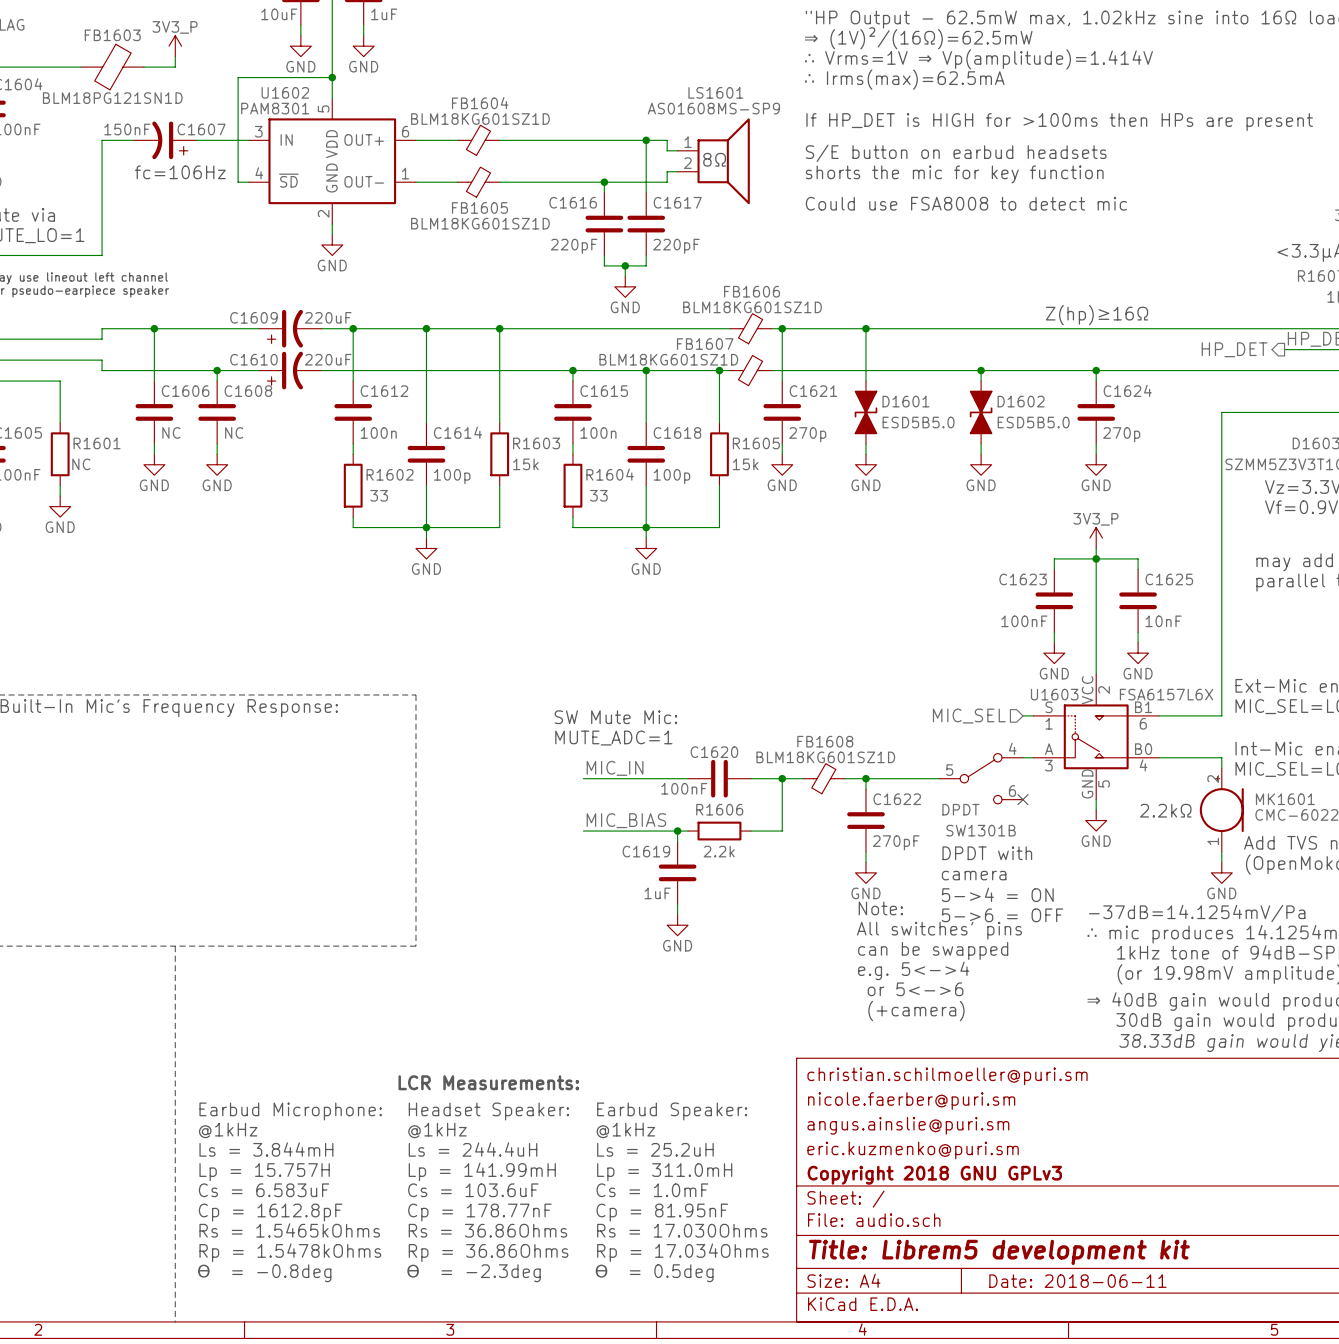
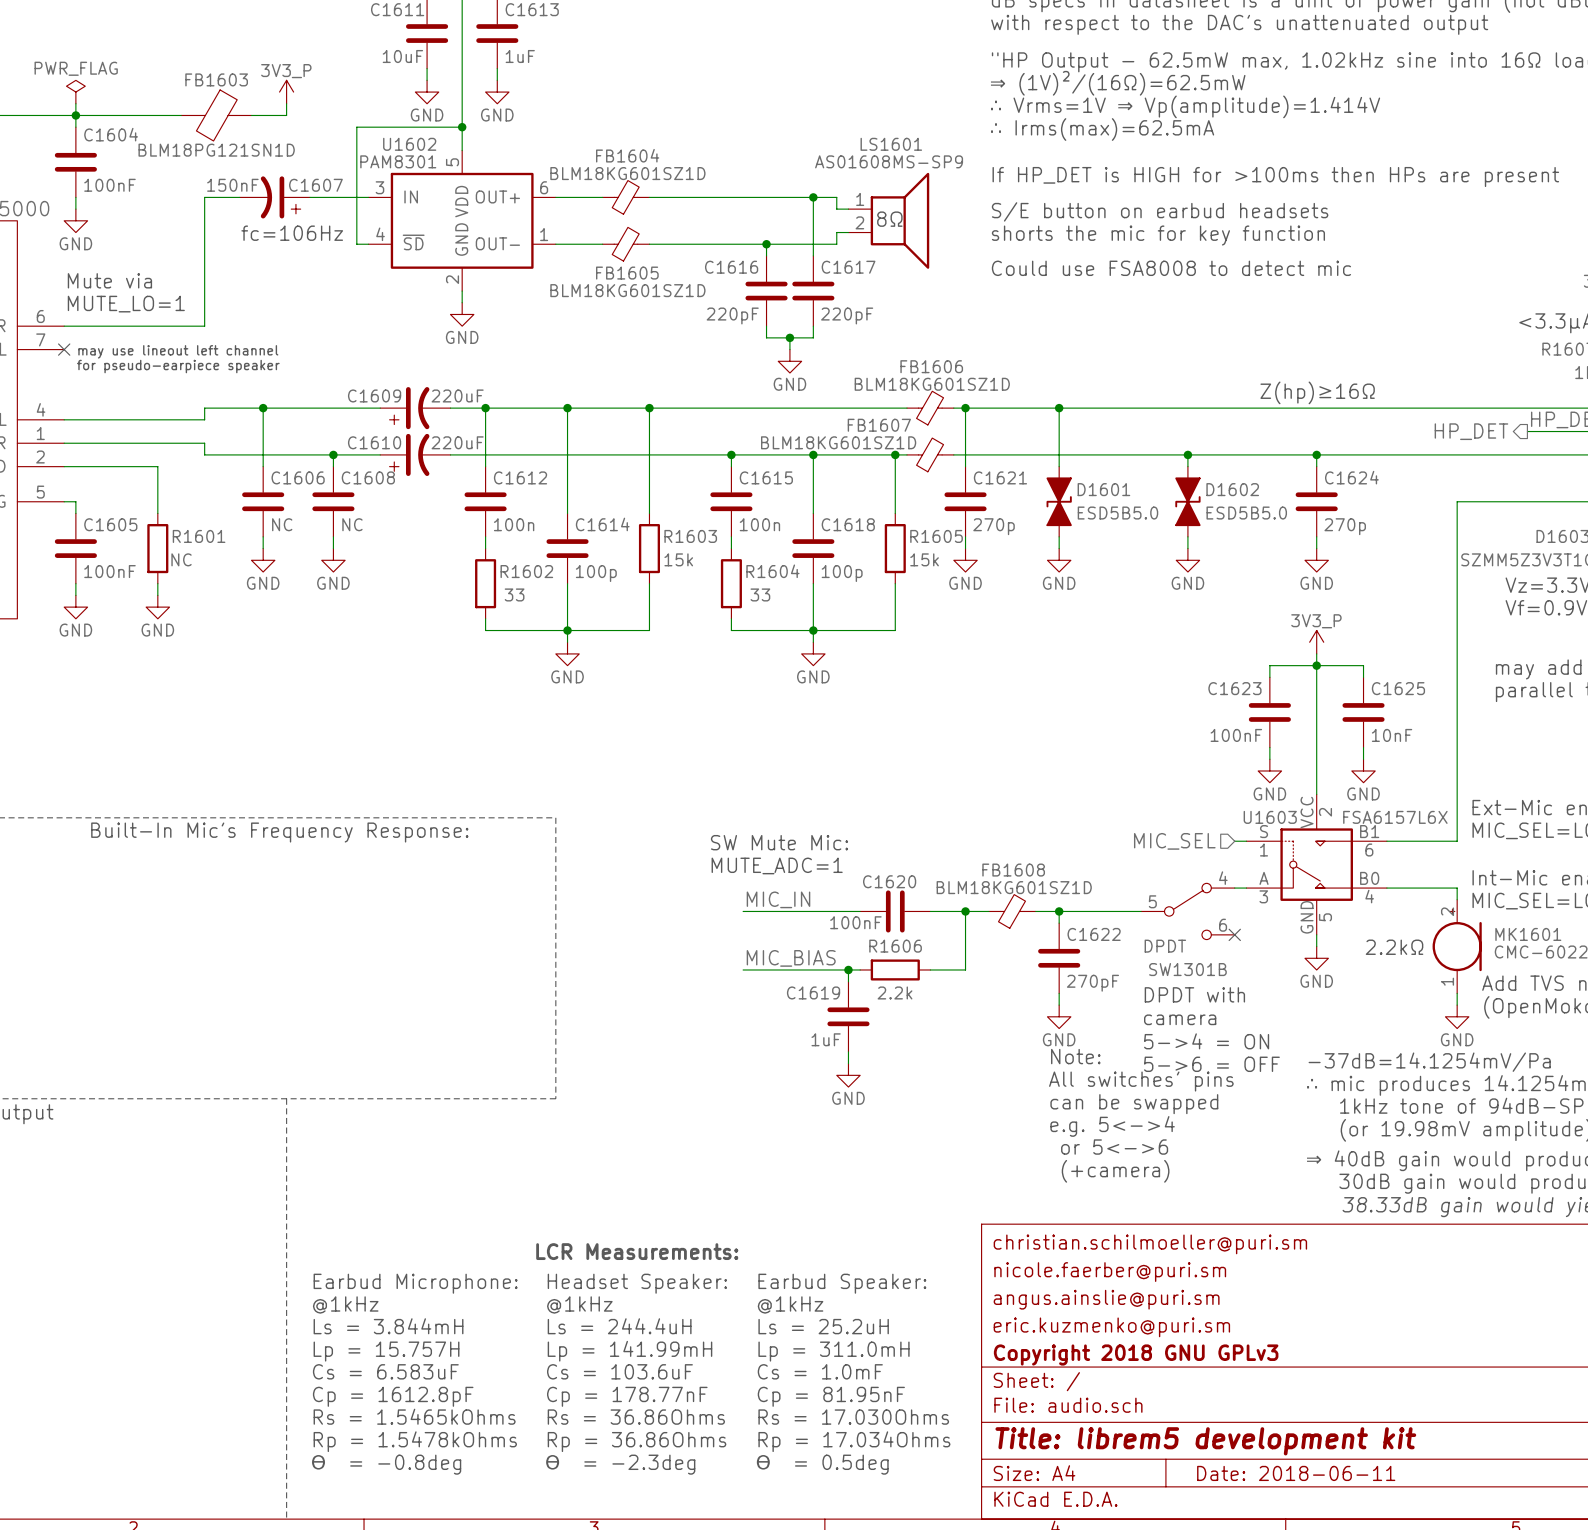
title block: Title: Librem5 development kit (999, 1252) -> Title: librem5 development kit (1205, 1441)

